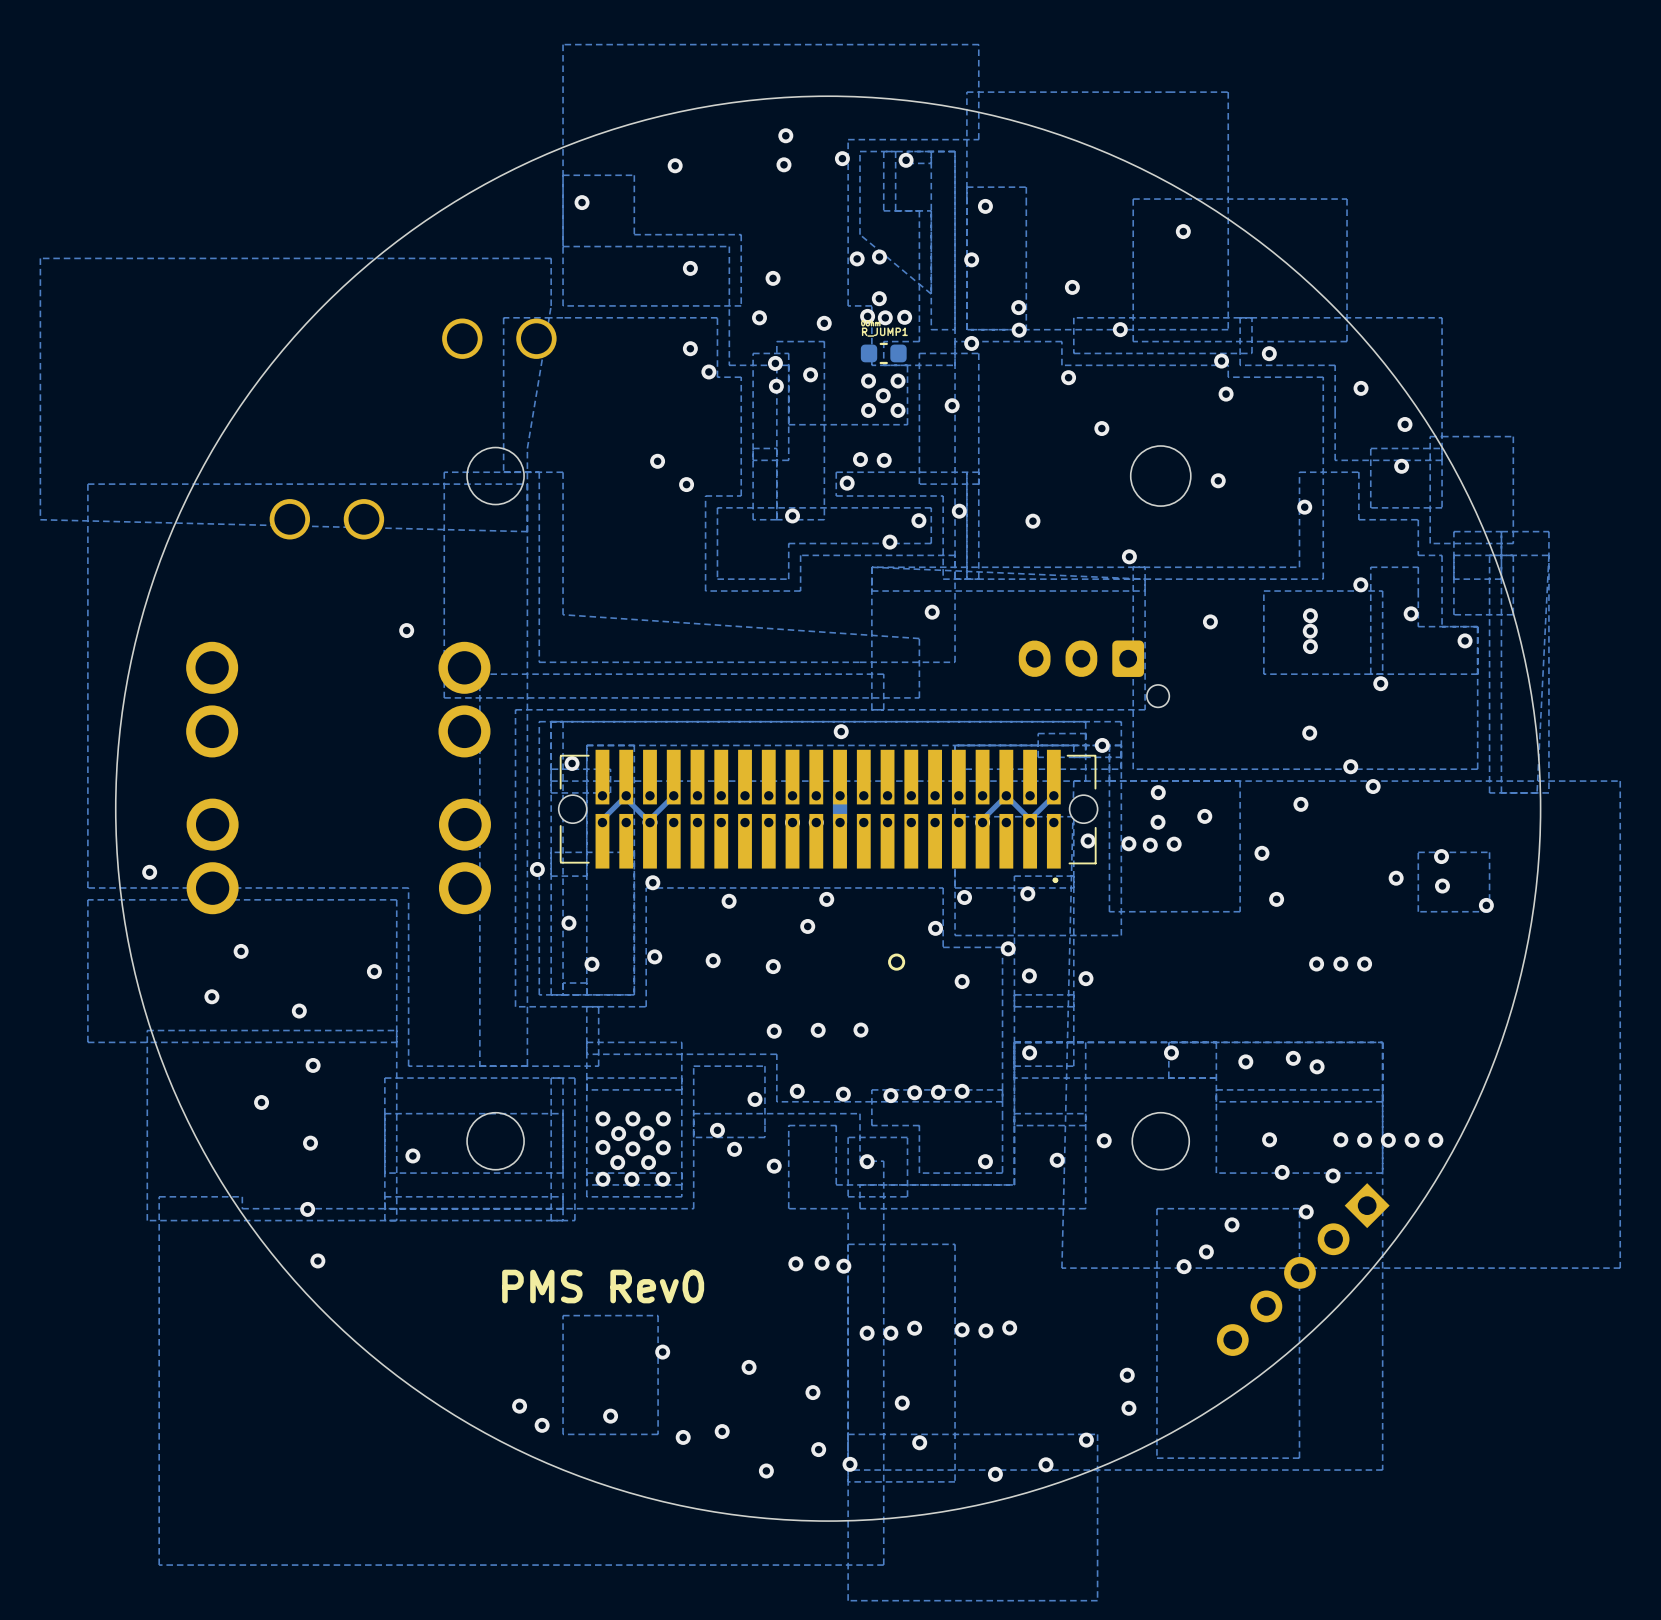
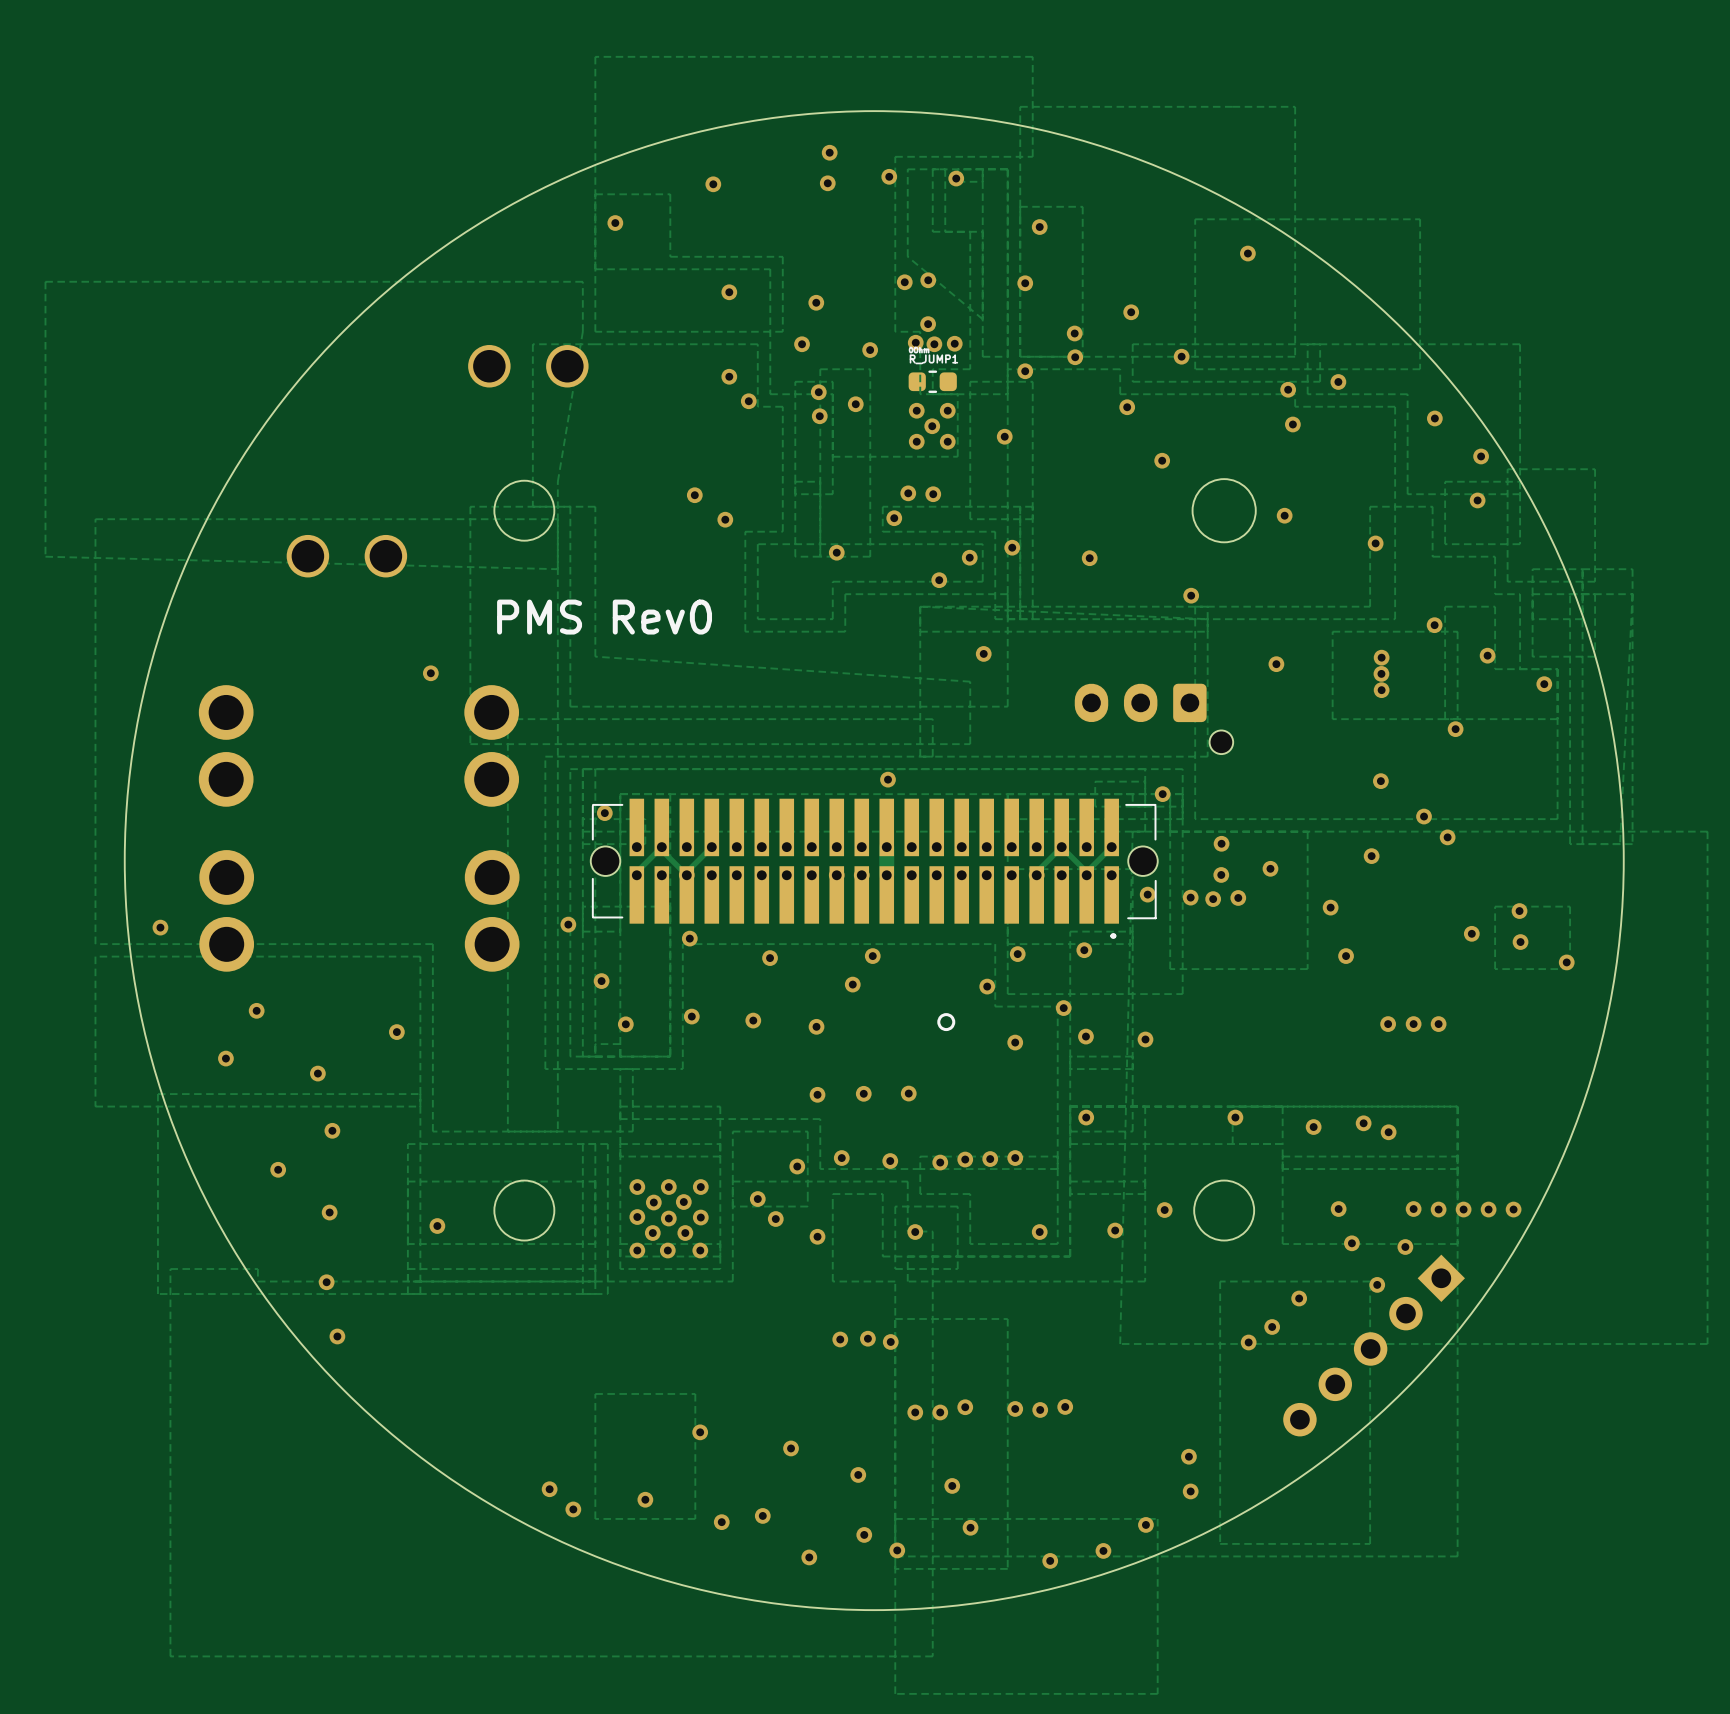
text: none -> PMS Rev0 (604, 617)
text: PMS Rev0 (603, 1286) -> none

